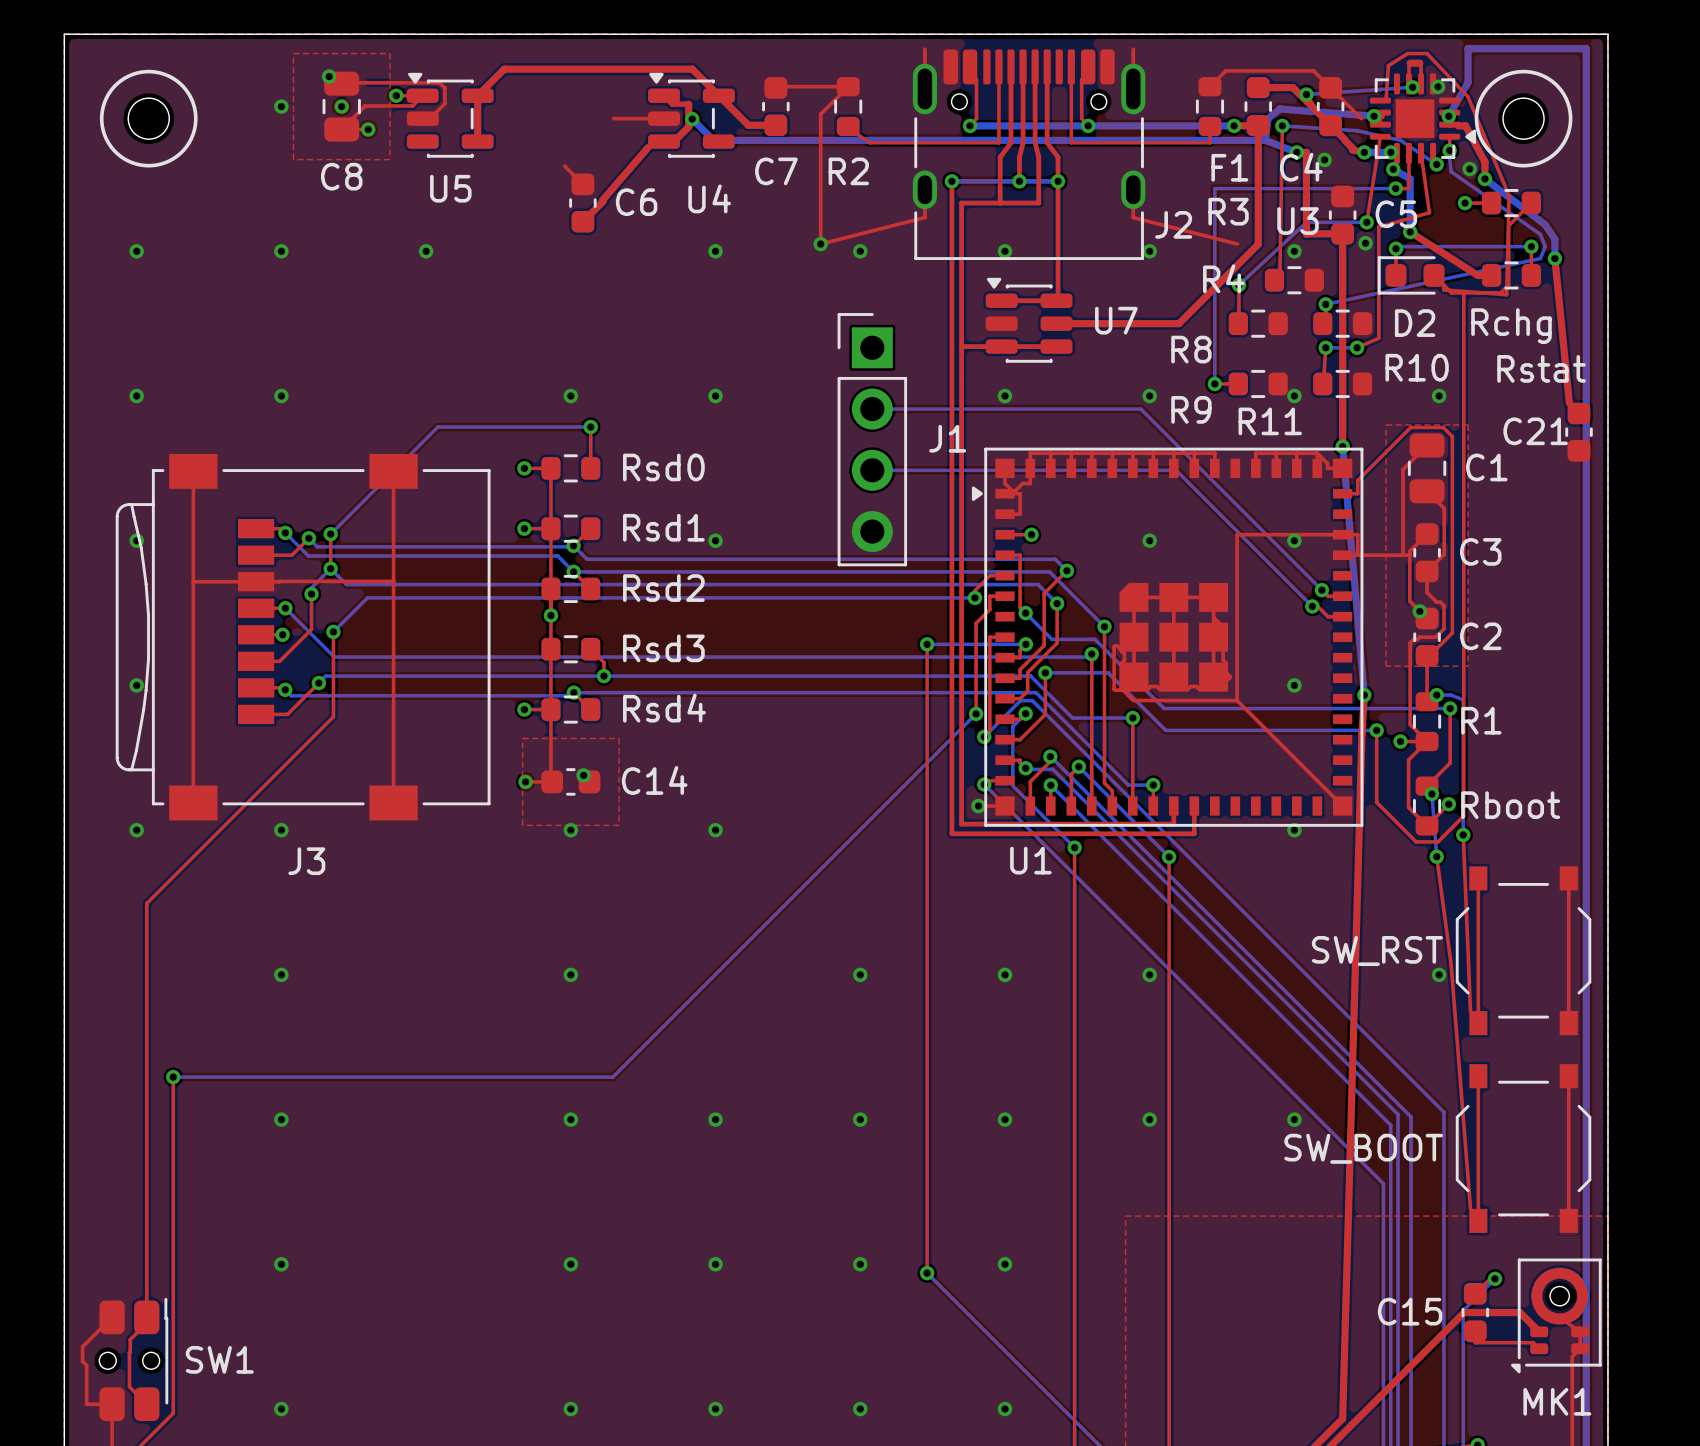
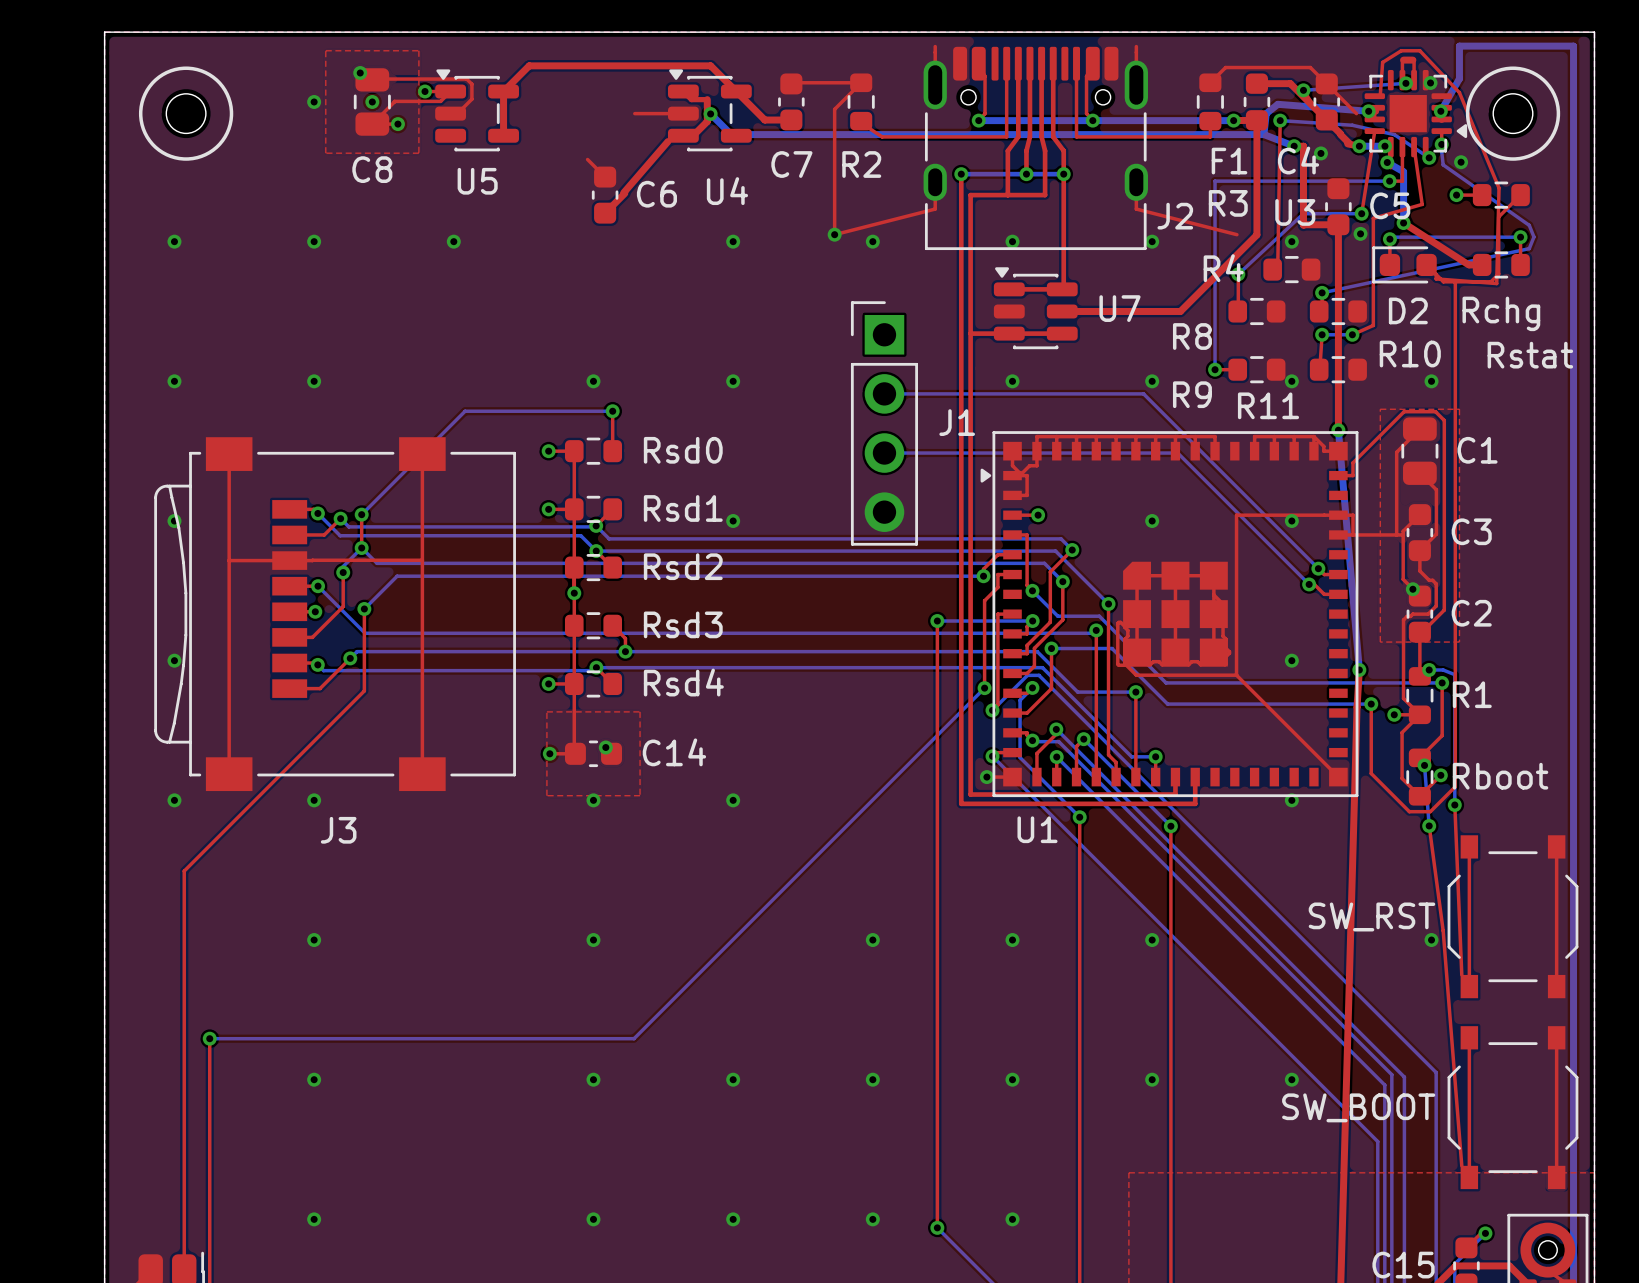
top track: (1458, 125) (1465, 125) (1484, 162) (1484, 178) -> none
bottom track: (1484, 178) (1545, 224) (1554, 239) (1554, 258) -> none
via: (1484, 178) -> none
top track: (1554, 258) (1569, 403) -> none
via: (1554, 258) -> none
C21: (1579, 432) -> none

